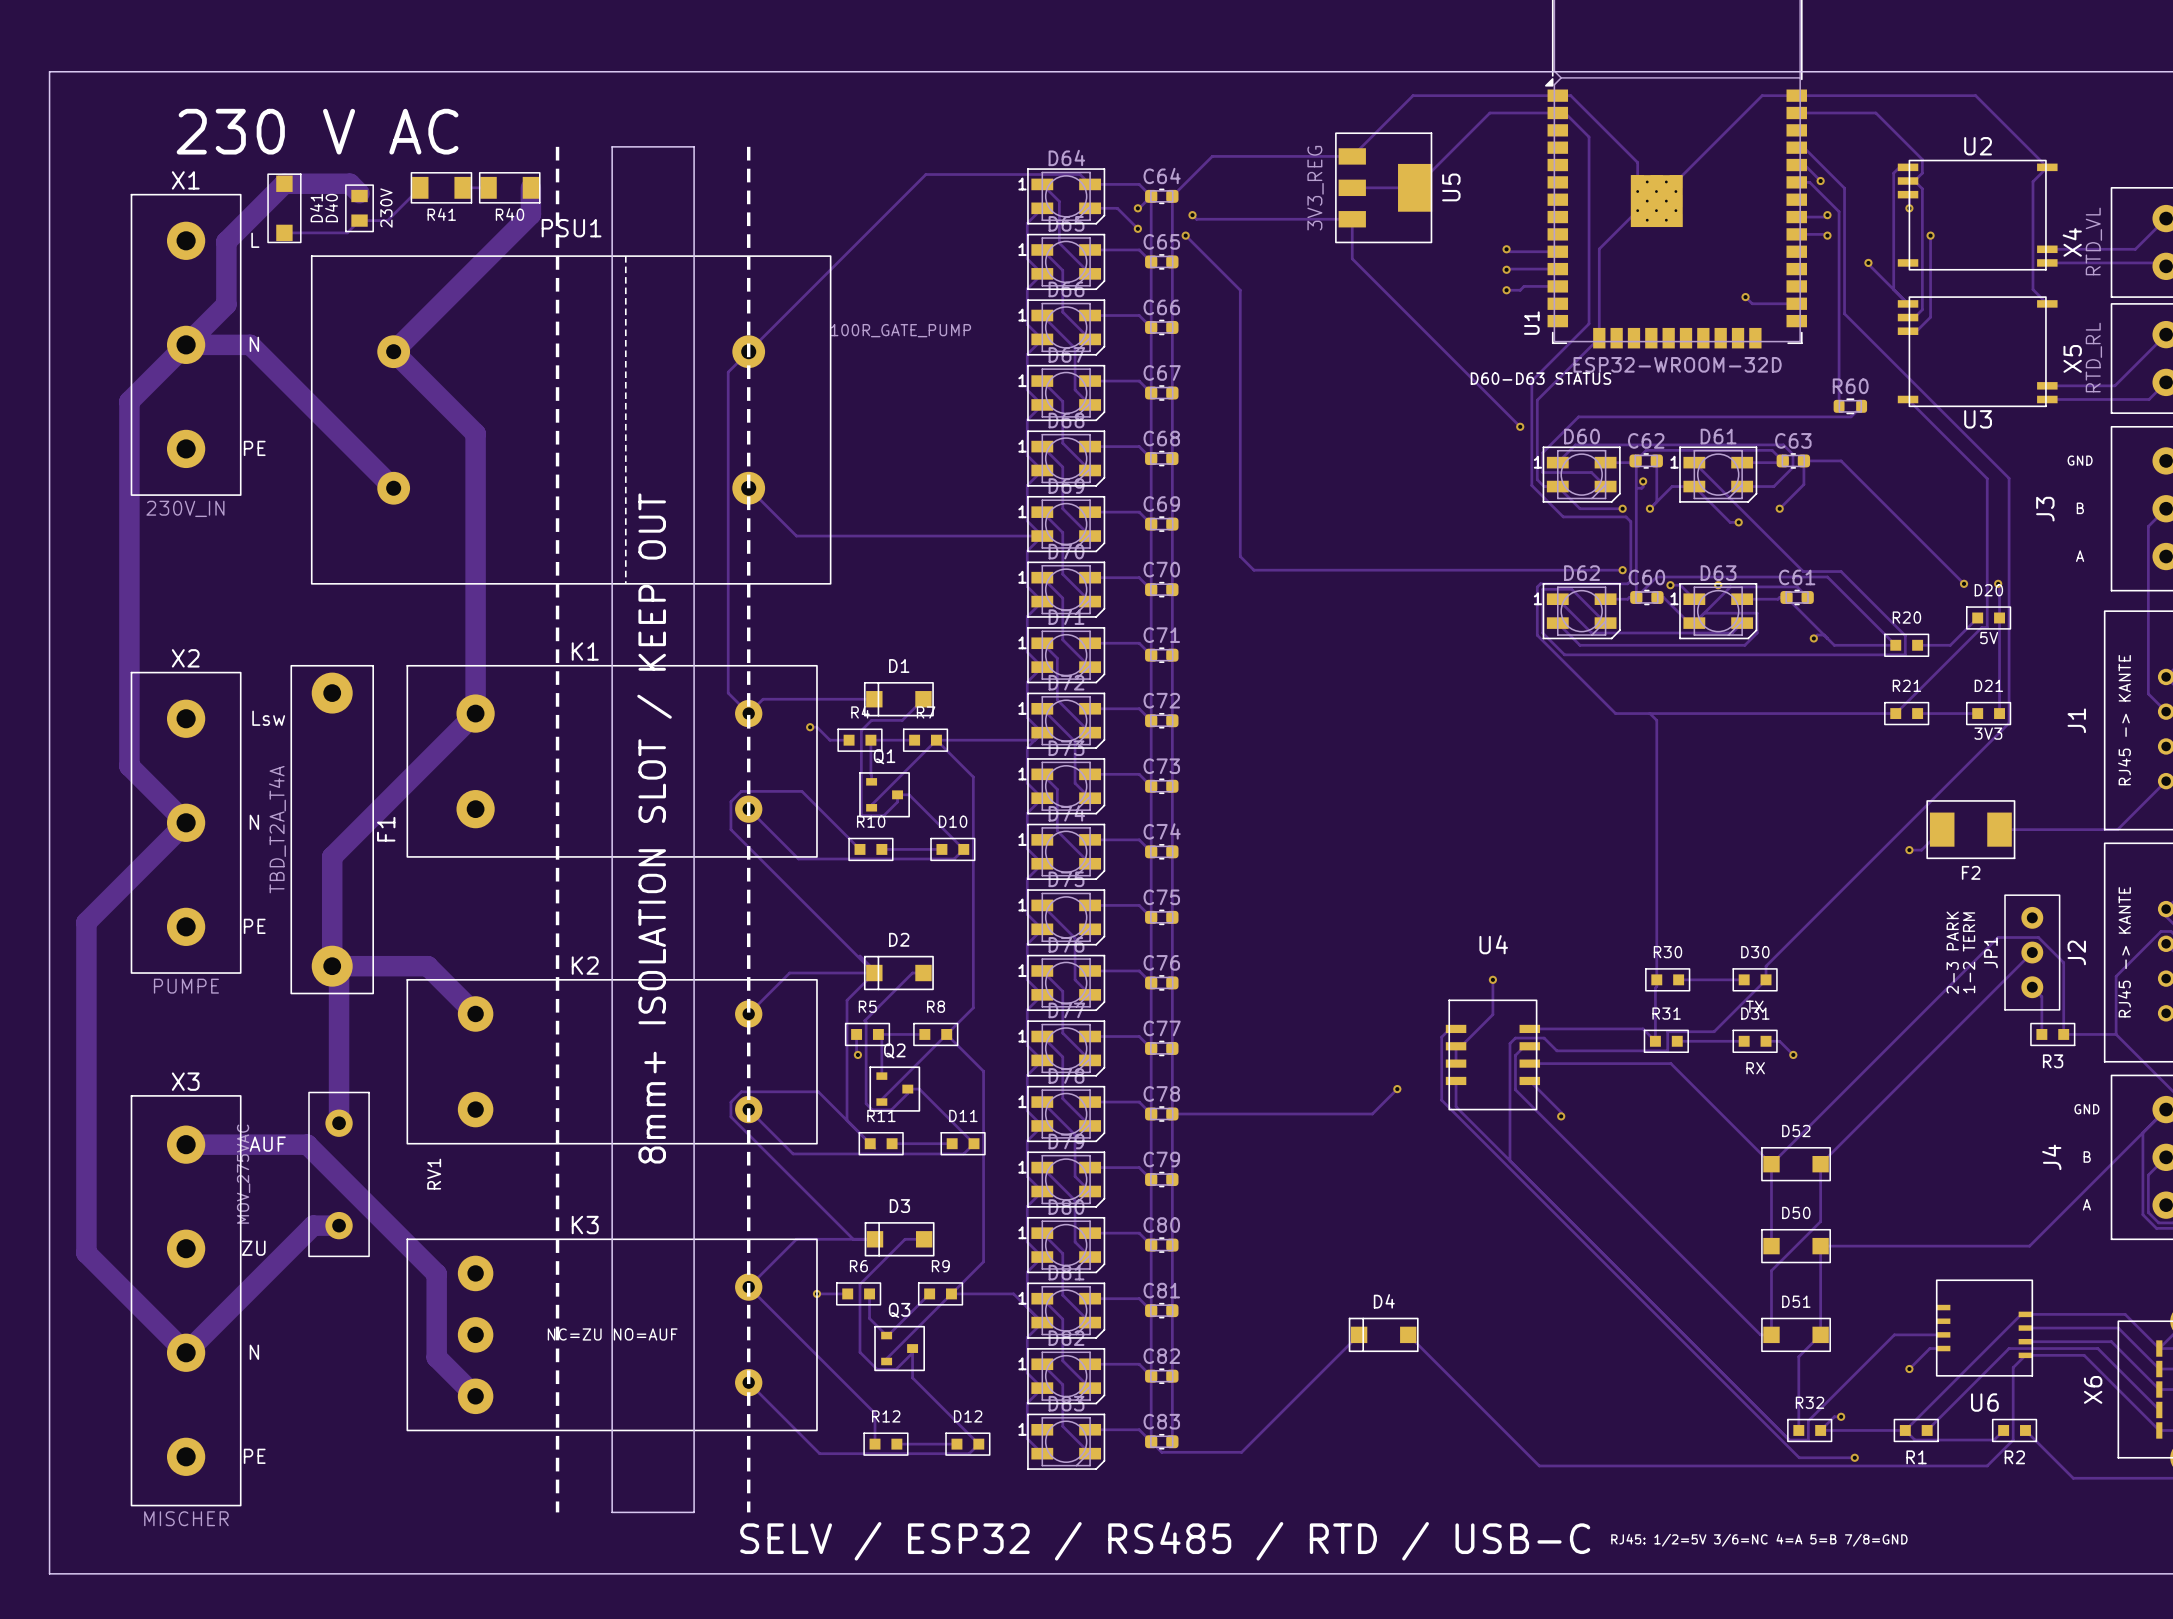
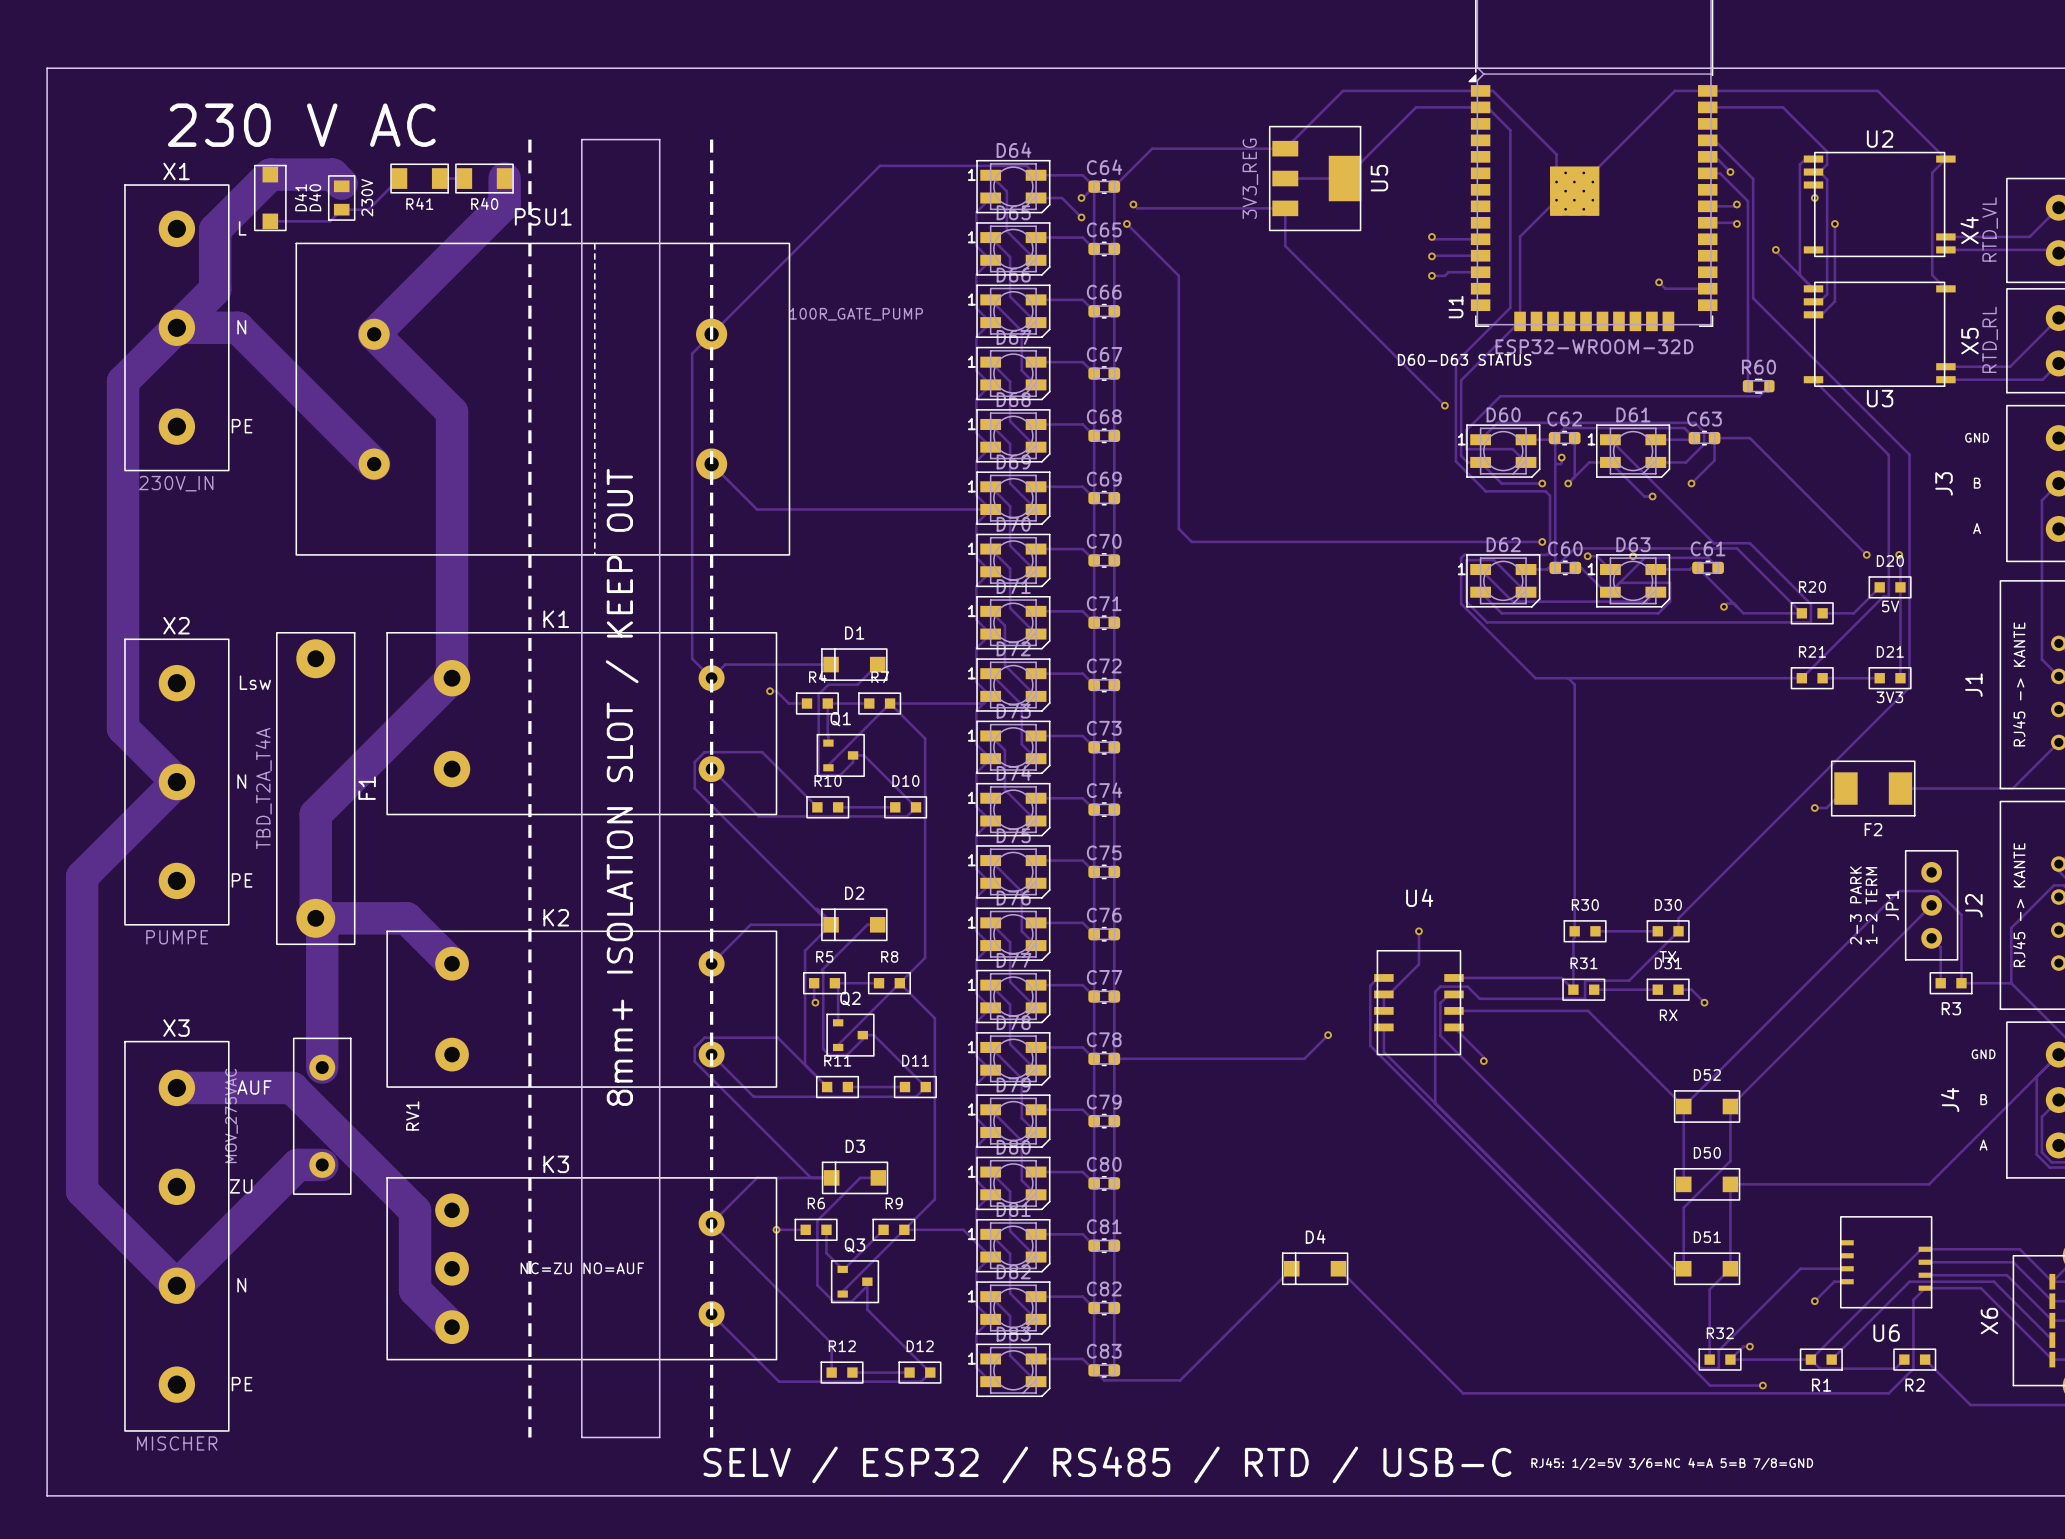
track width: thin (530, 187) (530, 214) (393, 351) (475, 433) (475, 713) (332, 856) (332, 966) -> thick (504, 178) (504, 203) (374, 334) (452, 412) (452, 678) (315, 814) (315, 918)
track width: thin (359, 193) (349, 183) (284, 183) (226, 241) (226, 304) (129, 401) (129, 766) (186, 822) (86, 922) (86, 1253) (186, 1352) (313, 1225) (339, 1225) -> thick (341, 183) (332, 174) (270, 174) (215, 229) (215, 289) (123, 381) (123, 728) (176, 782) (82, 876) (82, 1191) (176, 1285) (297, 1164) (322, 1164)
track width: thin (186, 344) (250, 344) (393, 488) -> thick (176, 327) (237, 327) (374, 464)
track width: thin (332, 966) (339, 973) (339, 1123) -> thick (315, 918) (322, 924) (322, 1067)
track width: thin (332, 966) (427, 966) (475, 1013) -> thick (315, 918) (406, 918) (452, 963)
track width: thin (186, 1144) (307, 1144) (436, 1274) (436, 1357) (475, 1396) -> thick (176, 1087) (292, 1087) (415, 1210) (415, 1290) (452, 1327)

